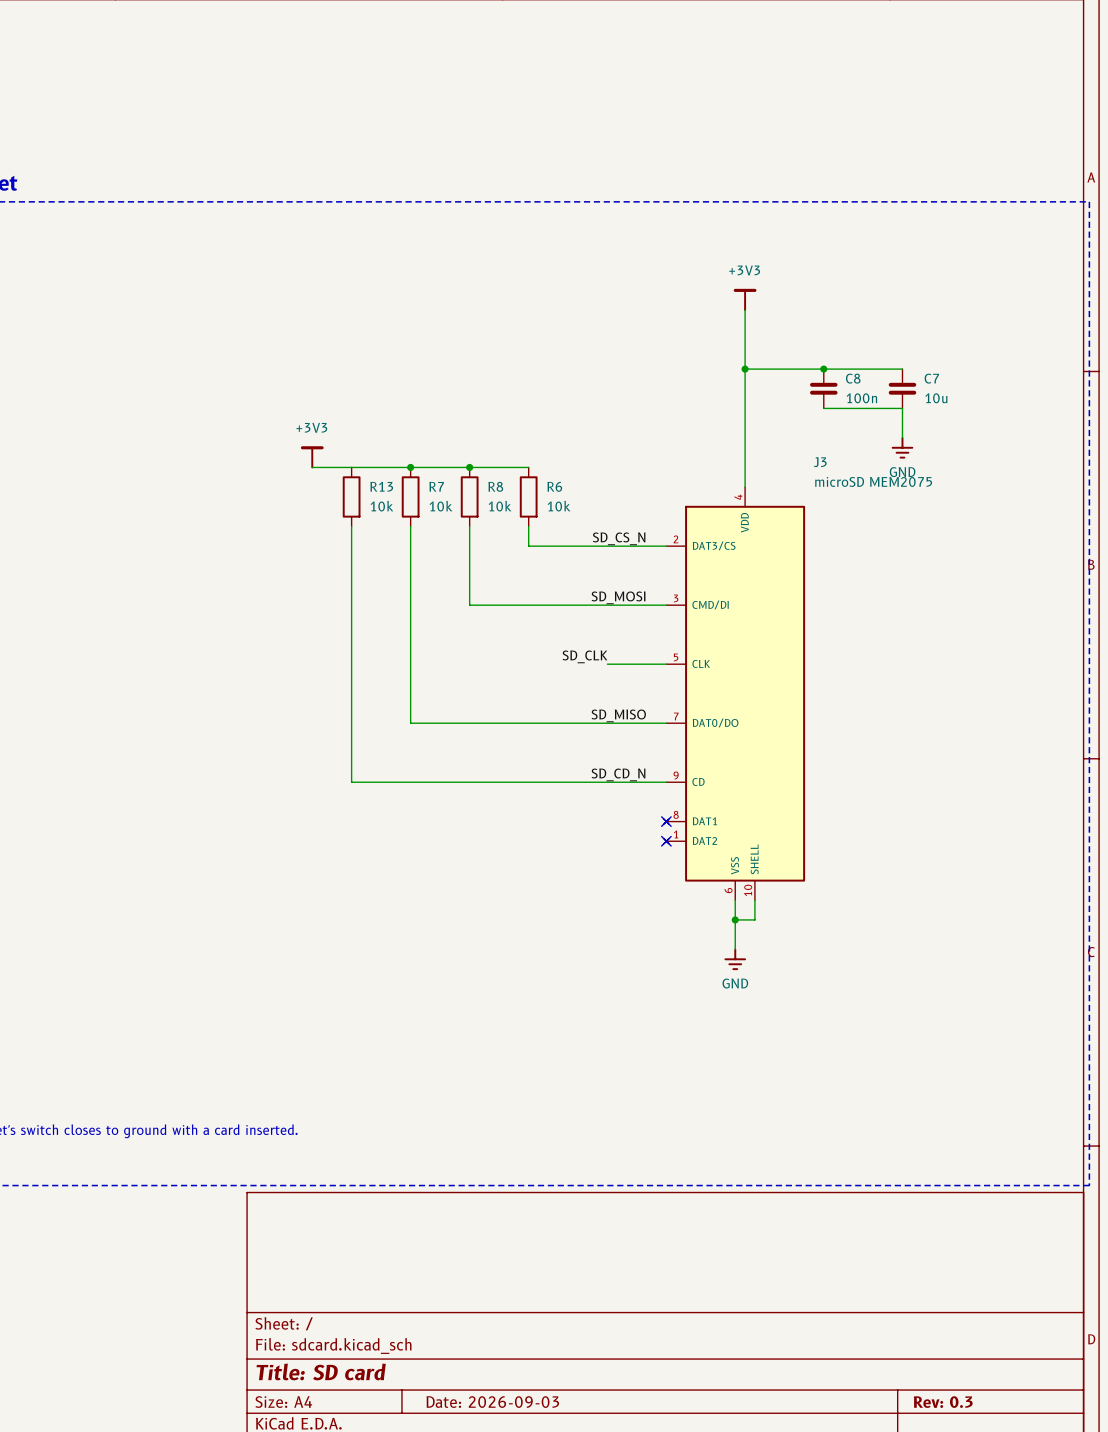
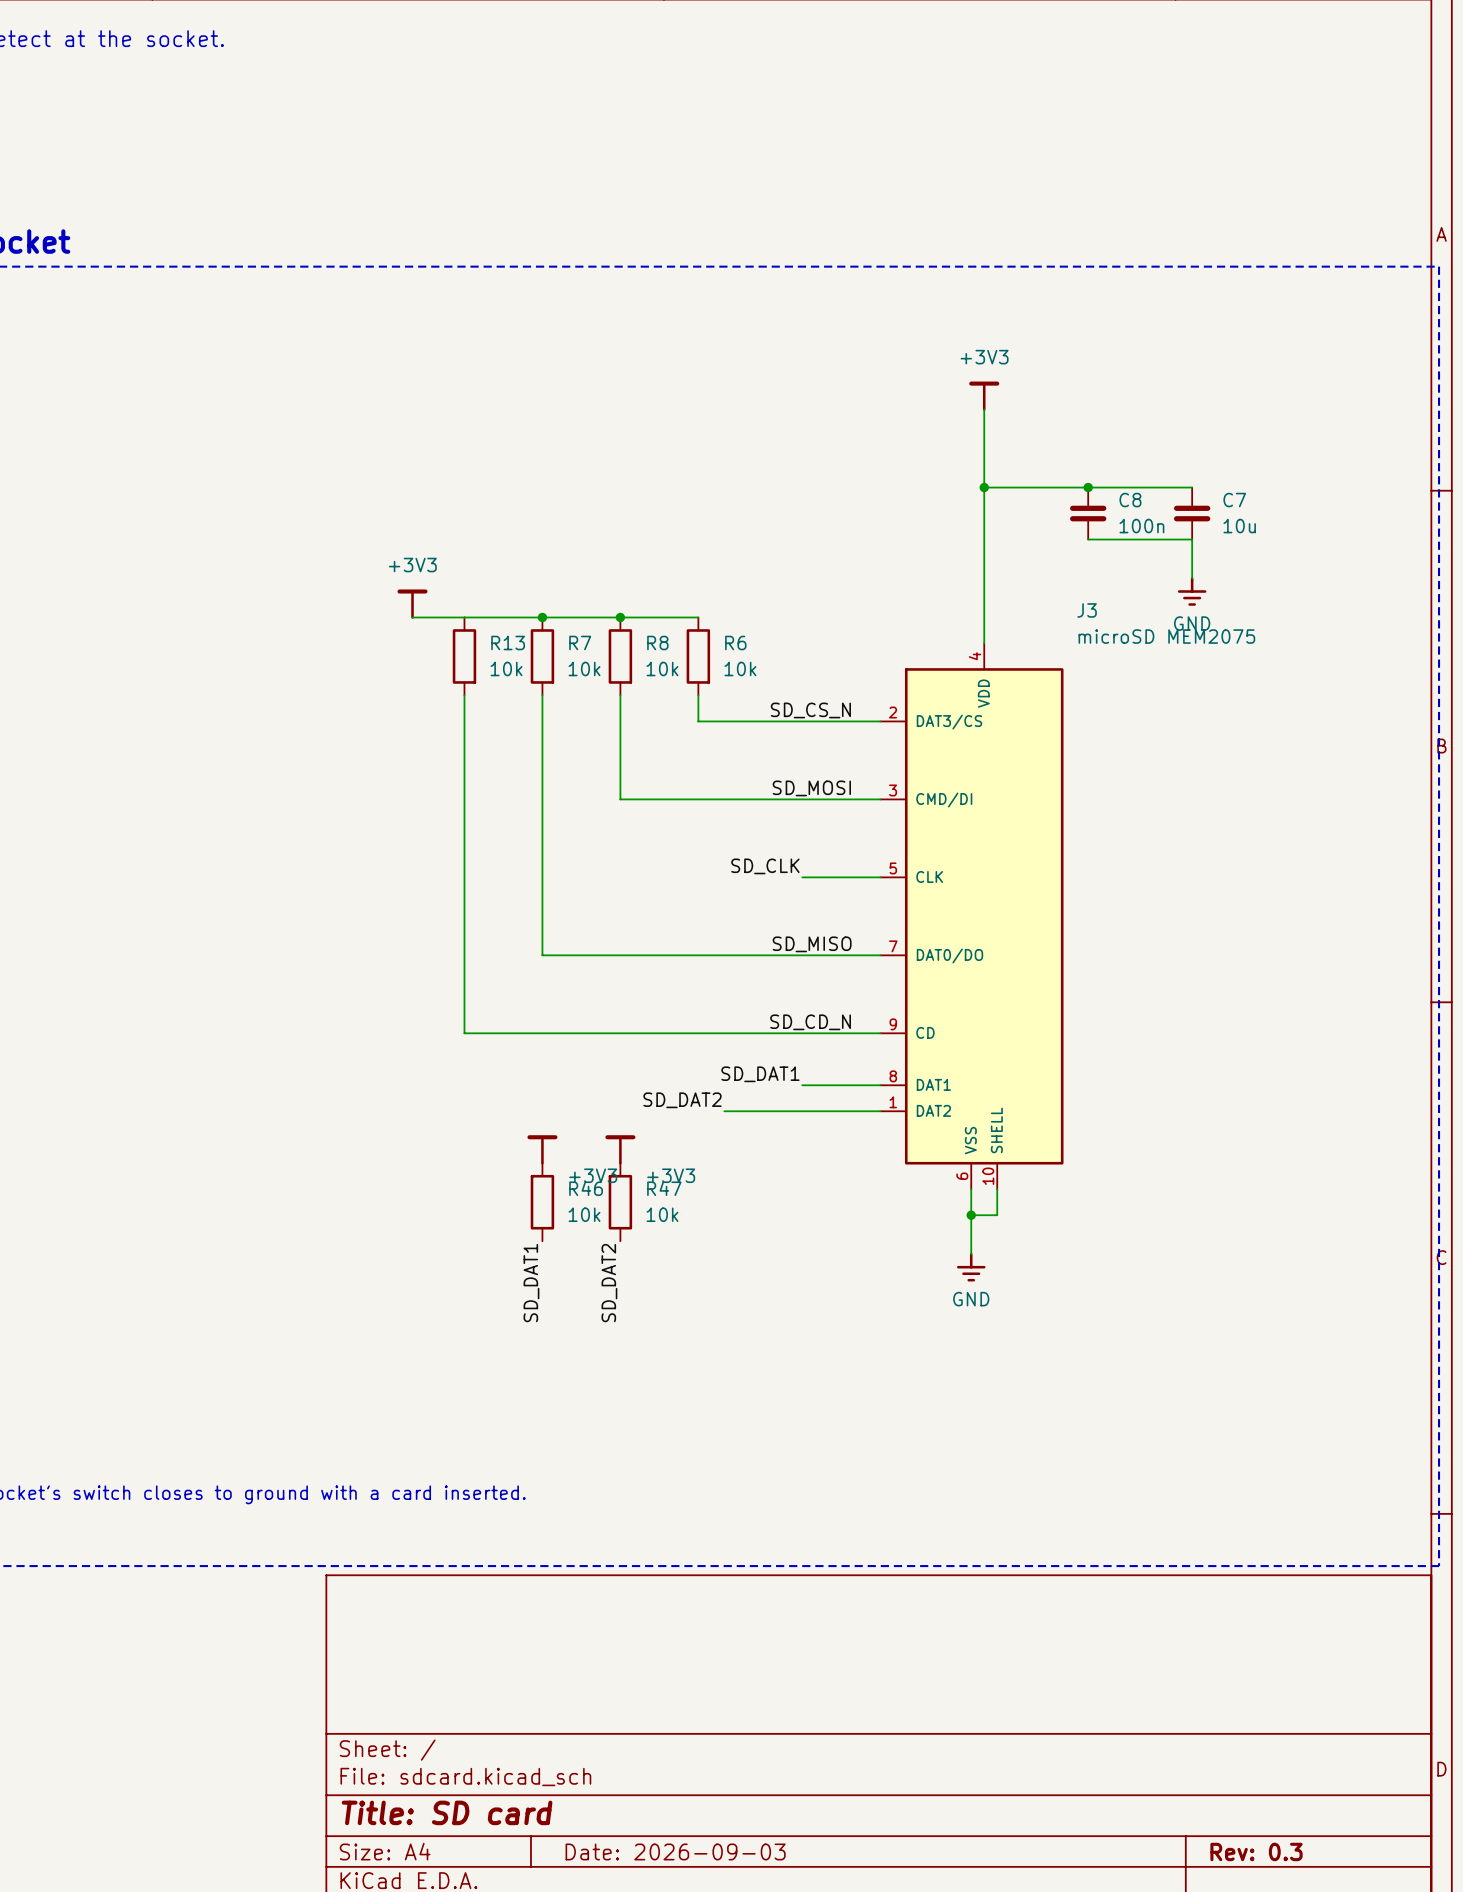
J3 symbol: [664, 487, 806, 901] -> [880, 643, 1064, 1190]
label: none -> SD_DAT1 (760, 1074)
wire: none -> (802, 1085) (880, 1085)
no-connect mark: (666, 821) -> none
label: none -> SD_DAT2 (682, 1100)
wire: none -> (724, 1111) (880, 1111)
no-connect mark: (666, 841) -> none
power symbol: none -> +3V3 (542, 1149)
power symbol: none -> +3V3 (620, 1149)
R46: none -> 10k (542, 1202)
R47: none -> 10k (620, 1202)
label: none -> SD_DAT1 (531, 1283)
label: none -> SD_DAT2 (609, 1283)

